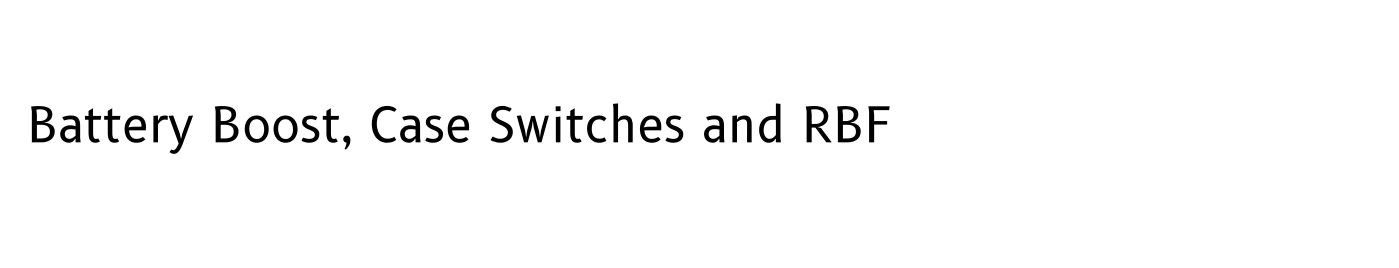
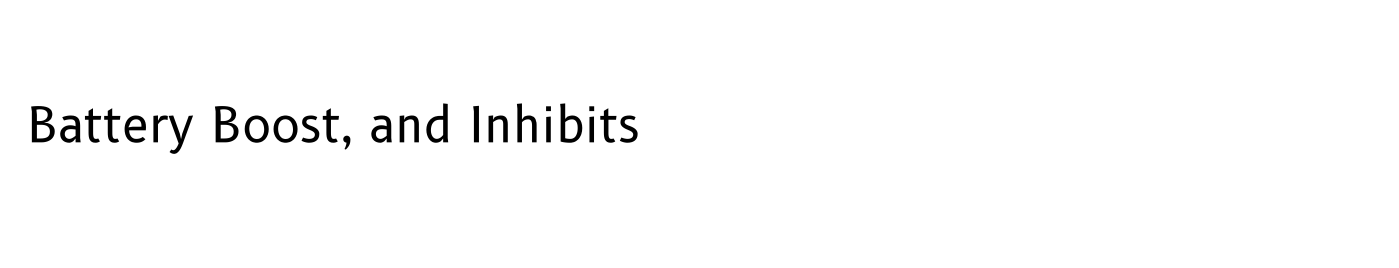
text: Battery Boost, Case Switches and RBF (460, 128) -> Battery Boost, and Inhibits (334, 128)

